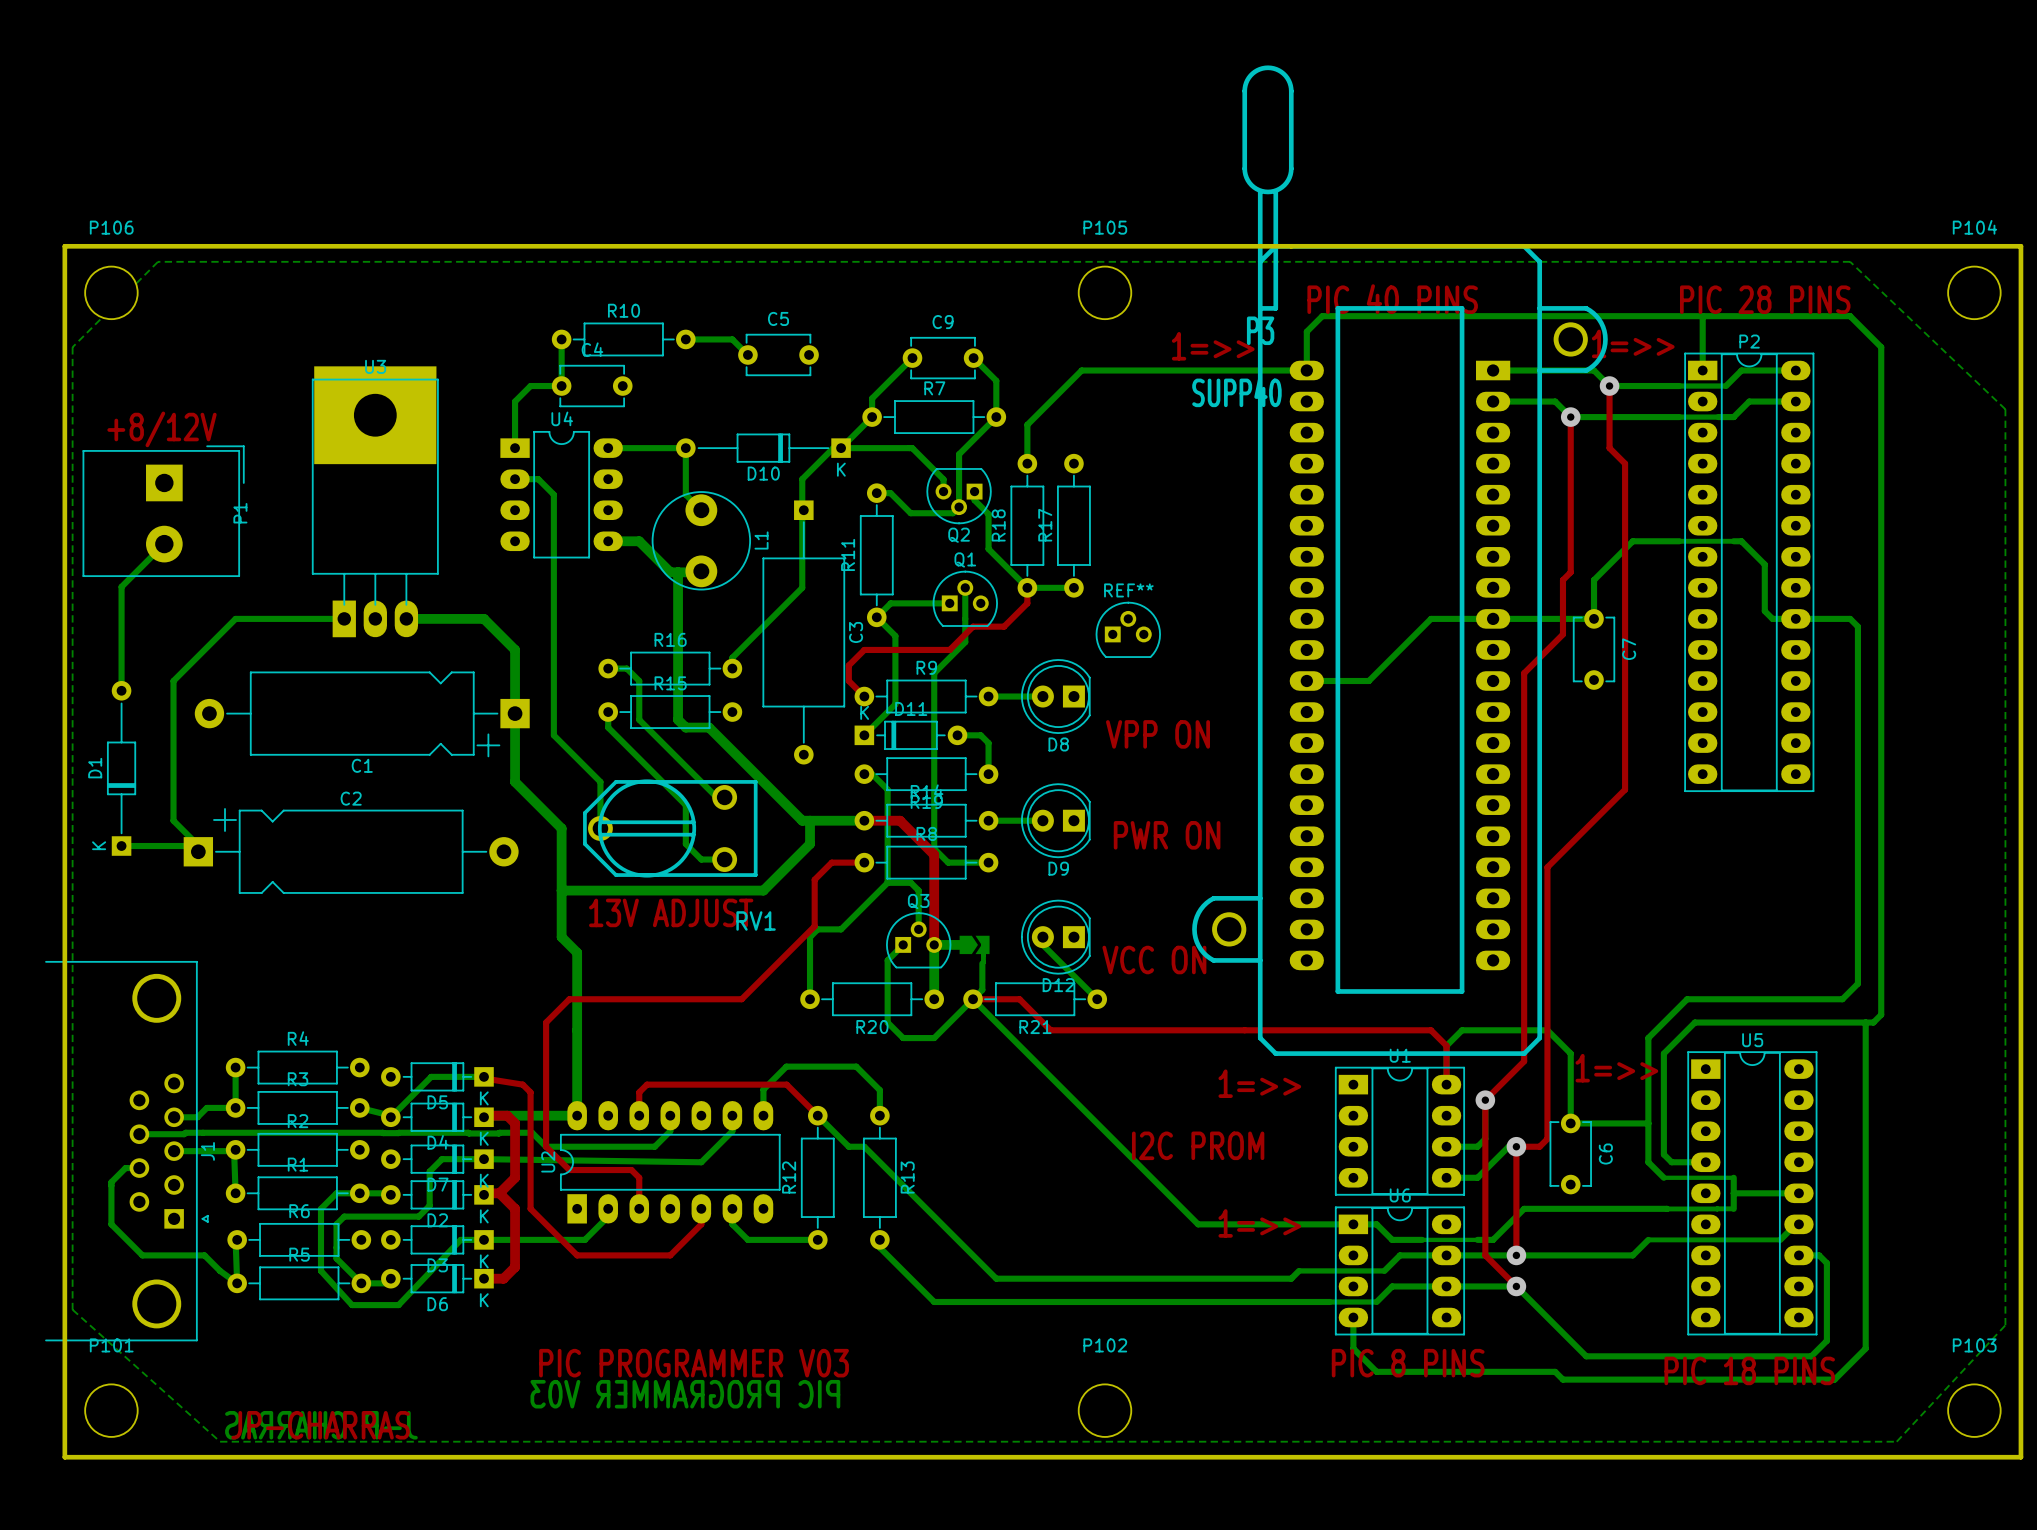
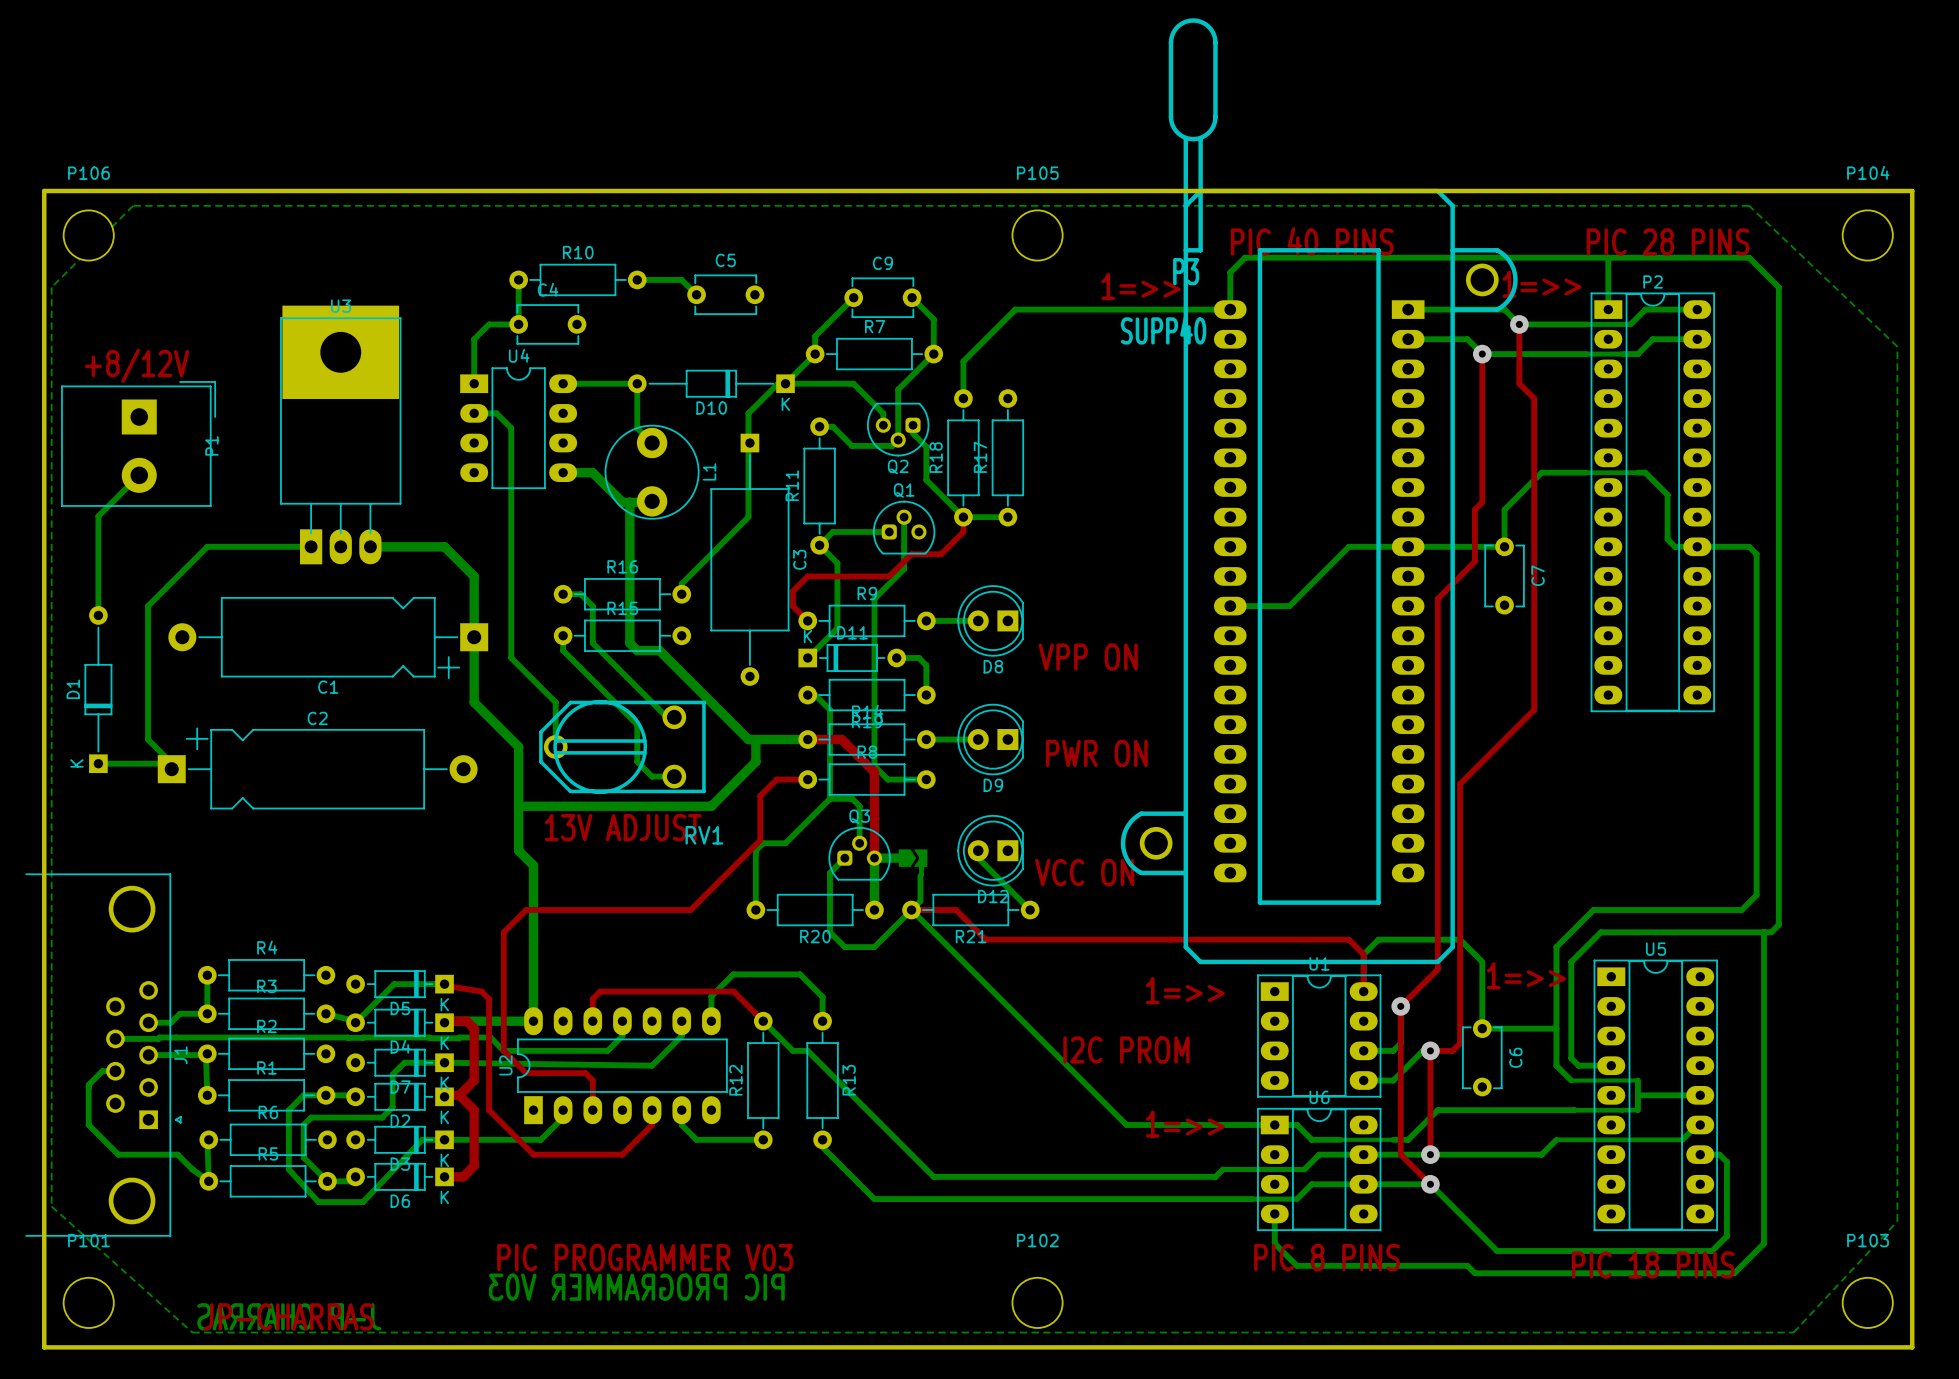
Q2 footprint: [926, 468, 992, 525] -> [867, 402, 930, 457]
Q1 footprint: [932, 570, 998, 627] -> [873, 500, 936, 555]
REF**: (1128, 629) -> none
Q3 footprint: [886, 912, 952, 969] -> [828, 827, 891, 881]

